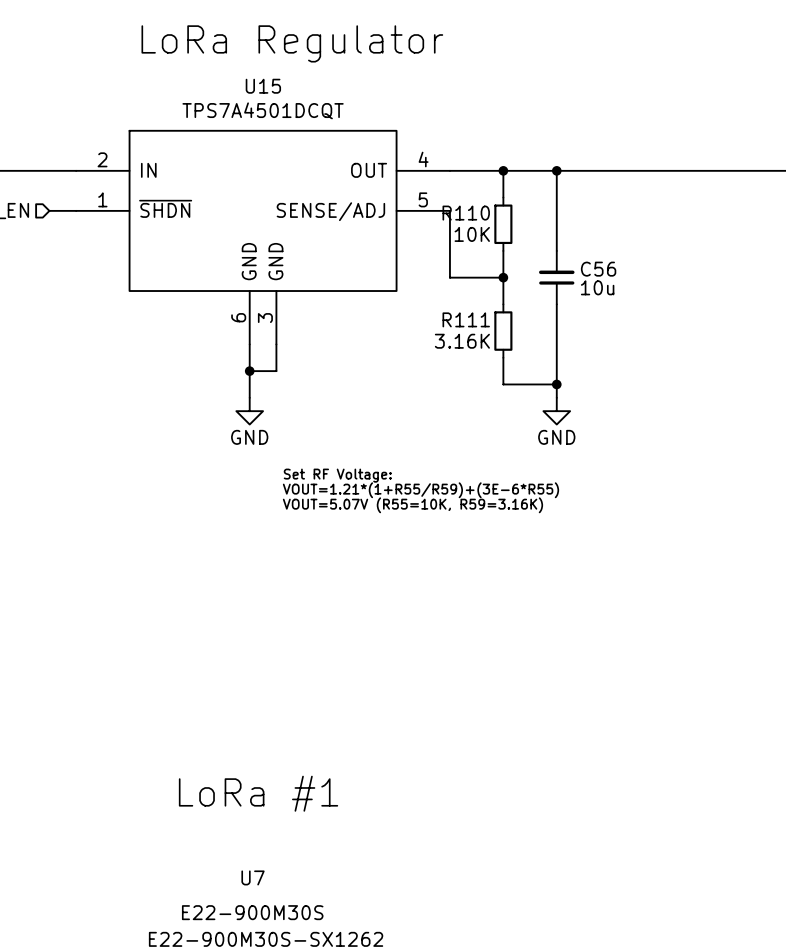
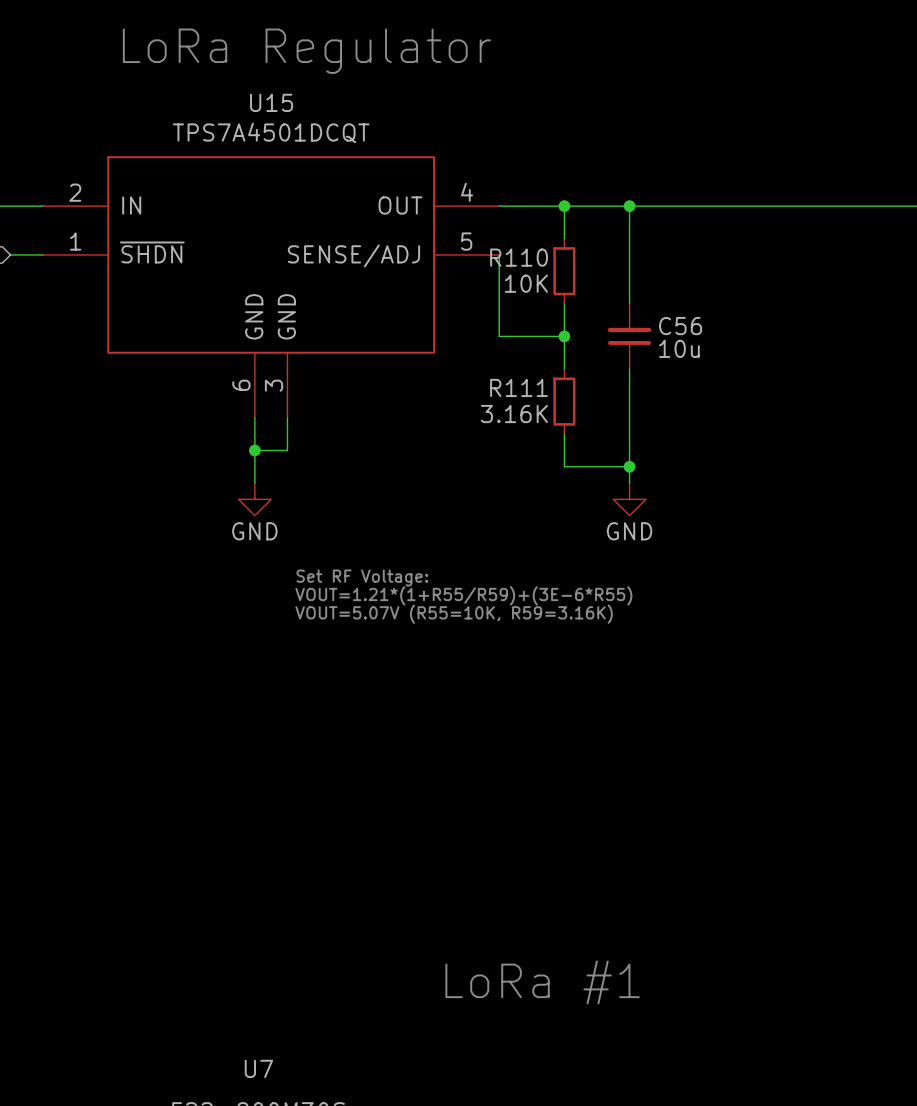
text position: LoRa #1 (258, 793) -> LoRa #1 (542, 982)

